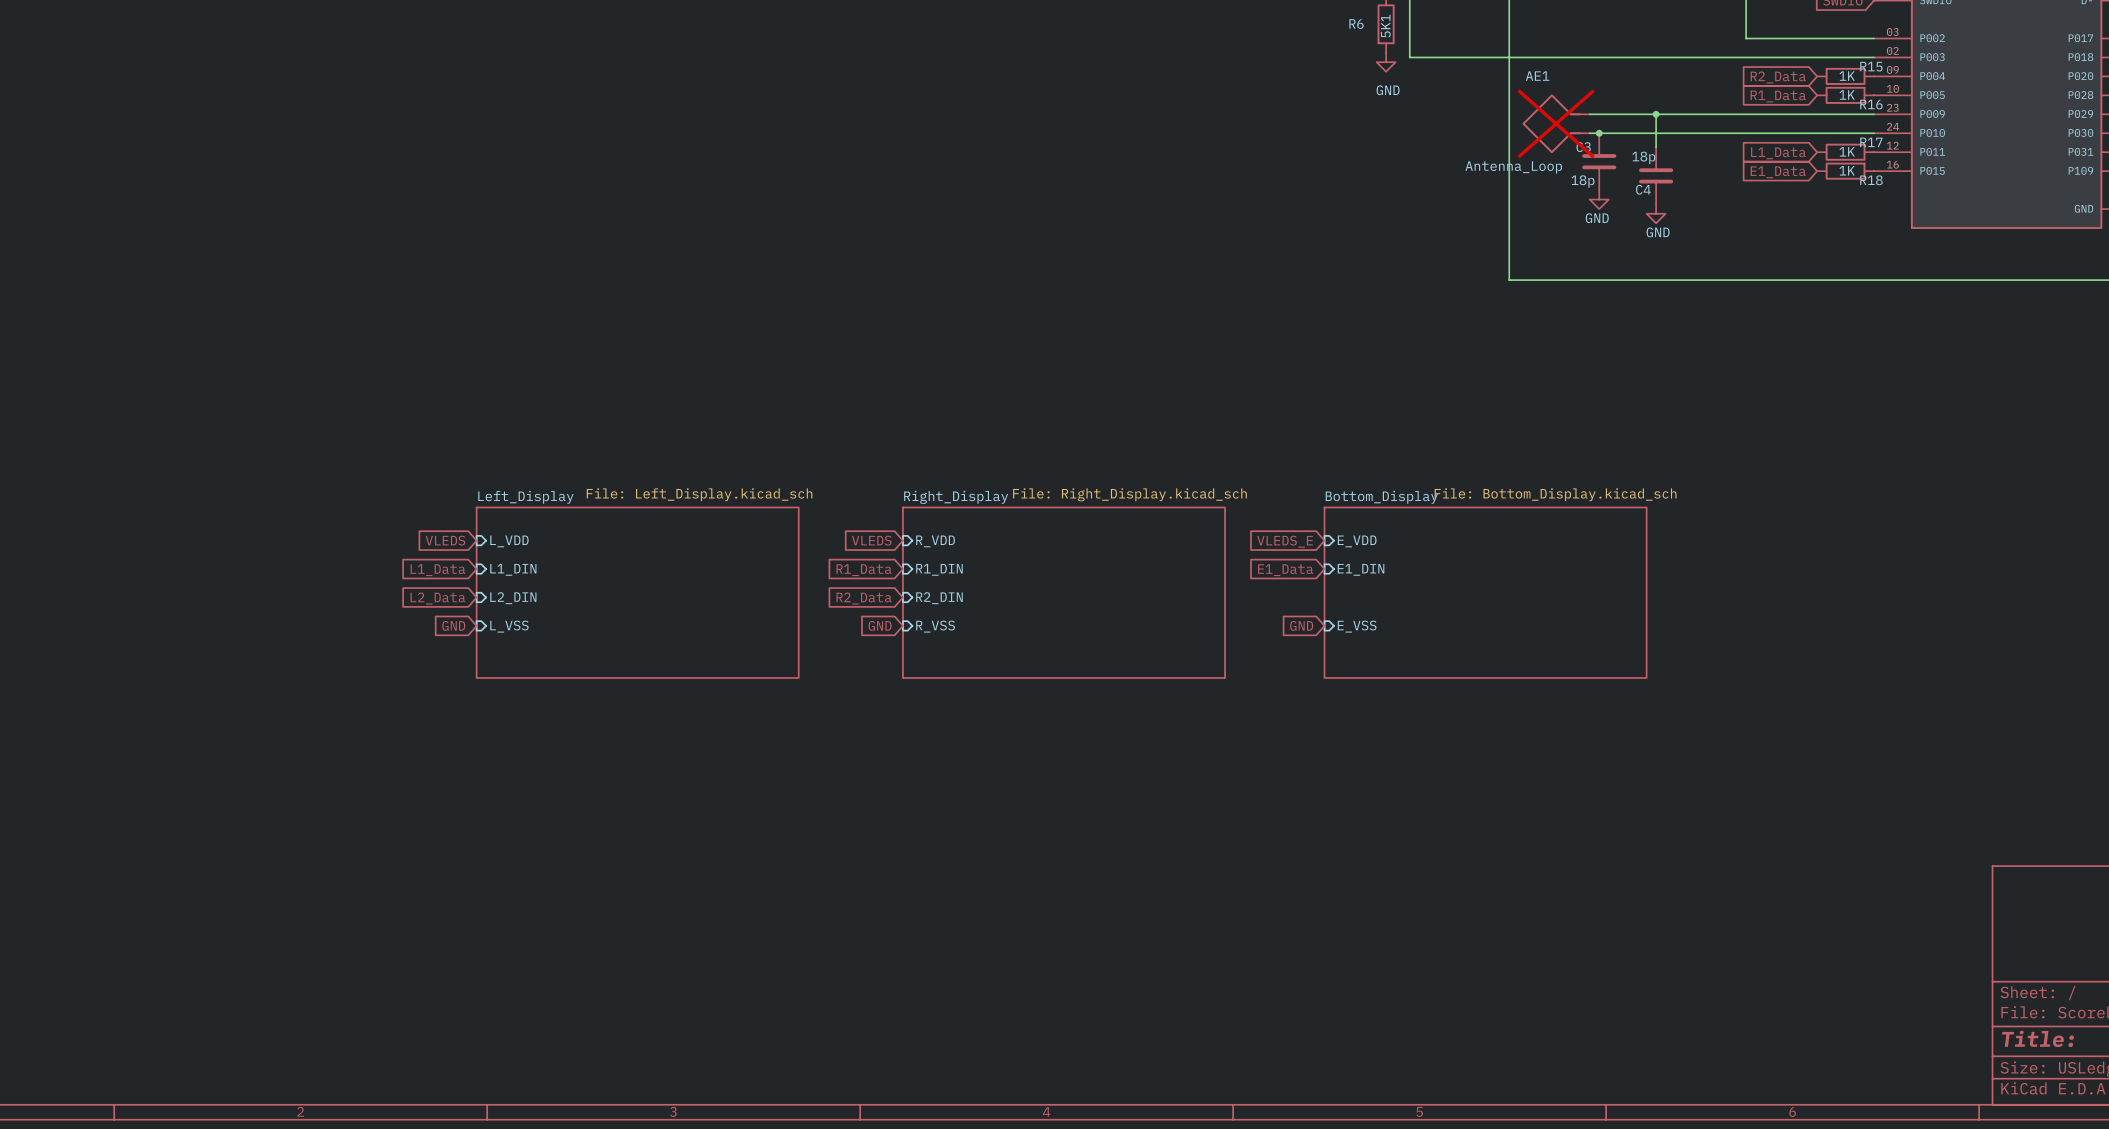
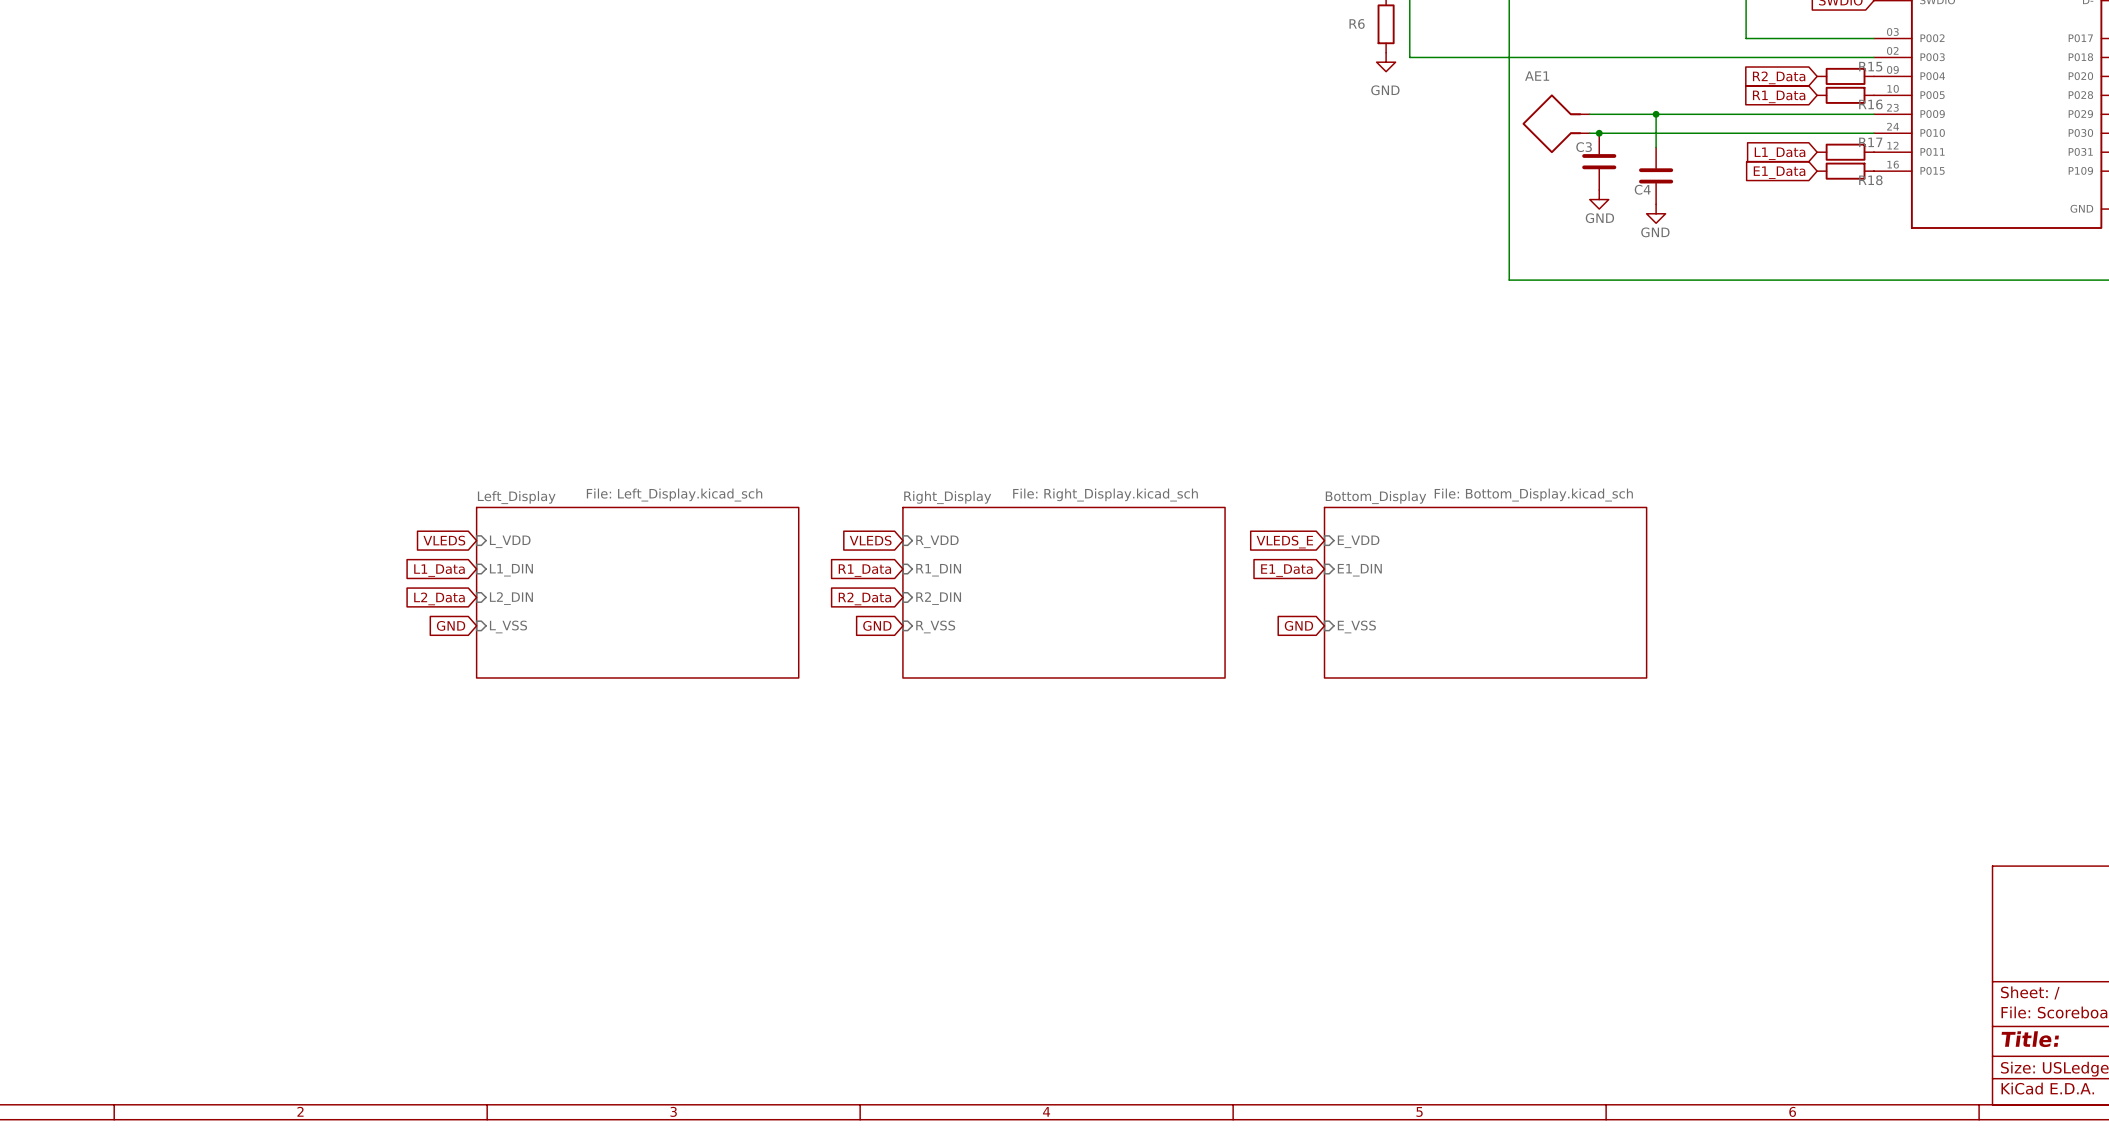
R6 value: 5K1 (1385, 26) -> none
R15 value: 1K (1847, 76) -> none
R16 value: 1K (1847, 95) -> none
AE1 do-not-place cross: (1556, 123) -> none
R17 value: 1K (1847, 151) -> none
C4 value: 18p (1643, 157) -> none
AE1 value: Antenna_Loop (1513, 167) -> none
R18 value: 1K (1847, 170) -> none
C3 value: 18p (1583, 181) -> none

